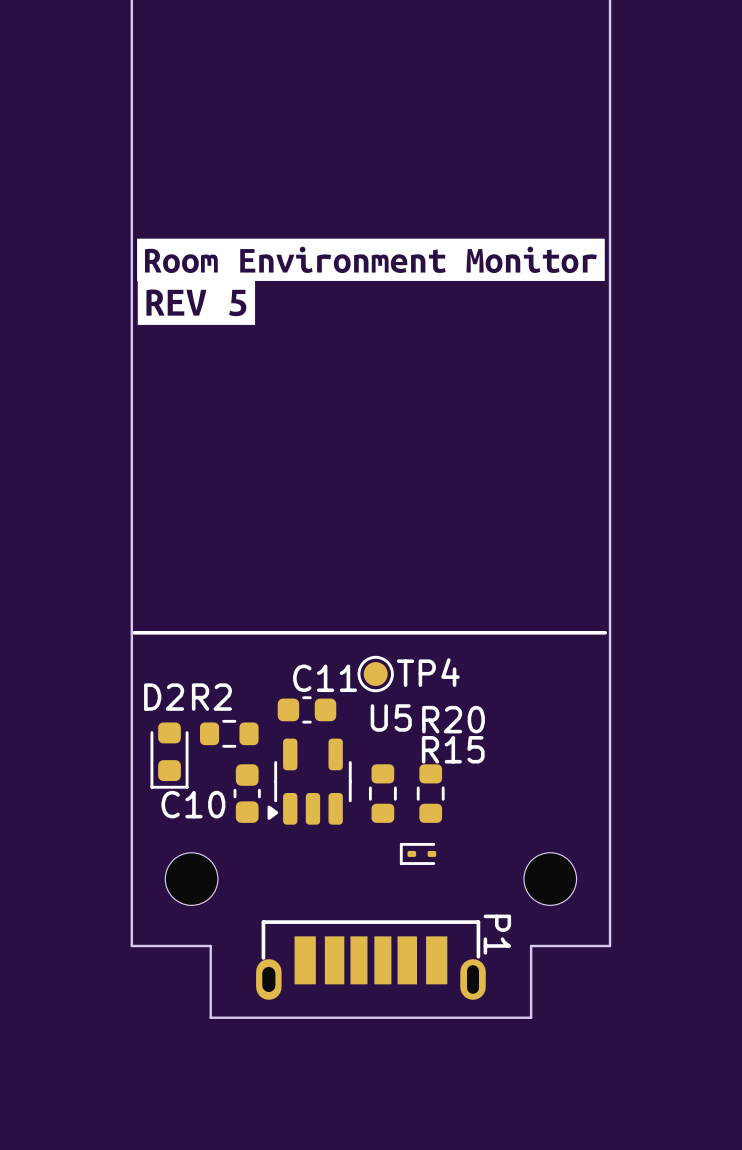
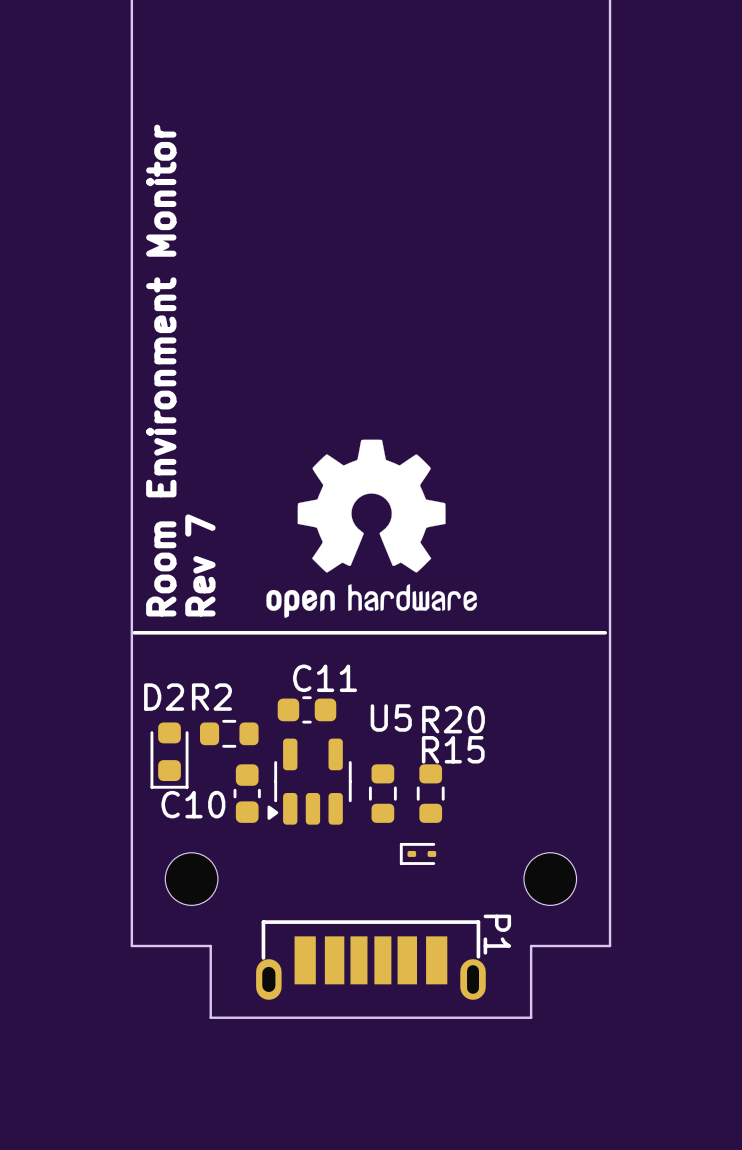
drawing: [137, 238, 605, 325] -> none
text: none -> Room Environment Monitor (161, 370)
drawing: none -> [266, 439, 477, 618]
text: none -> Rev 7 (200, 565)
TP4: (375, 674) -> none

